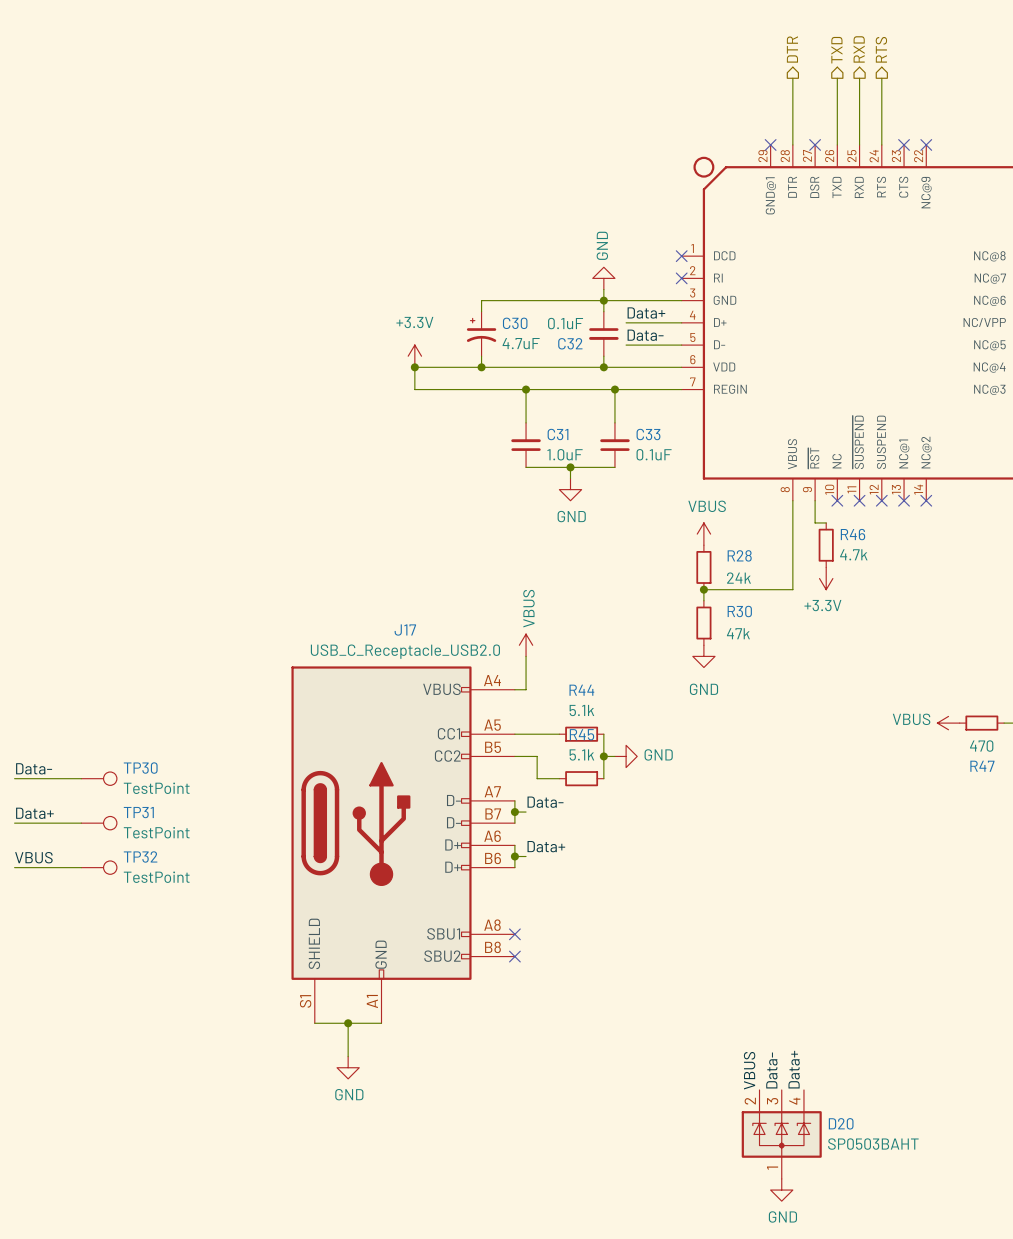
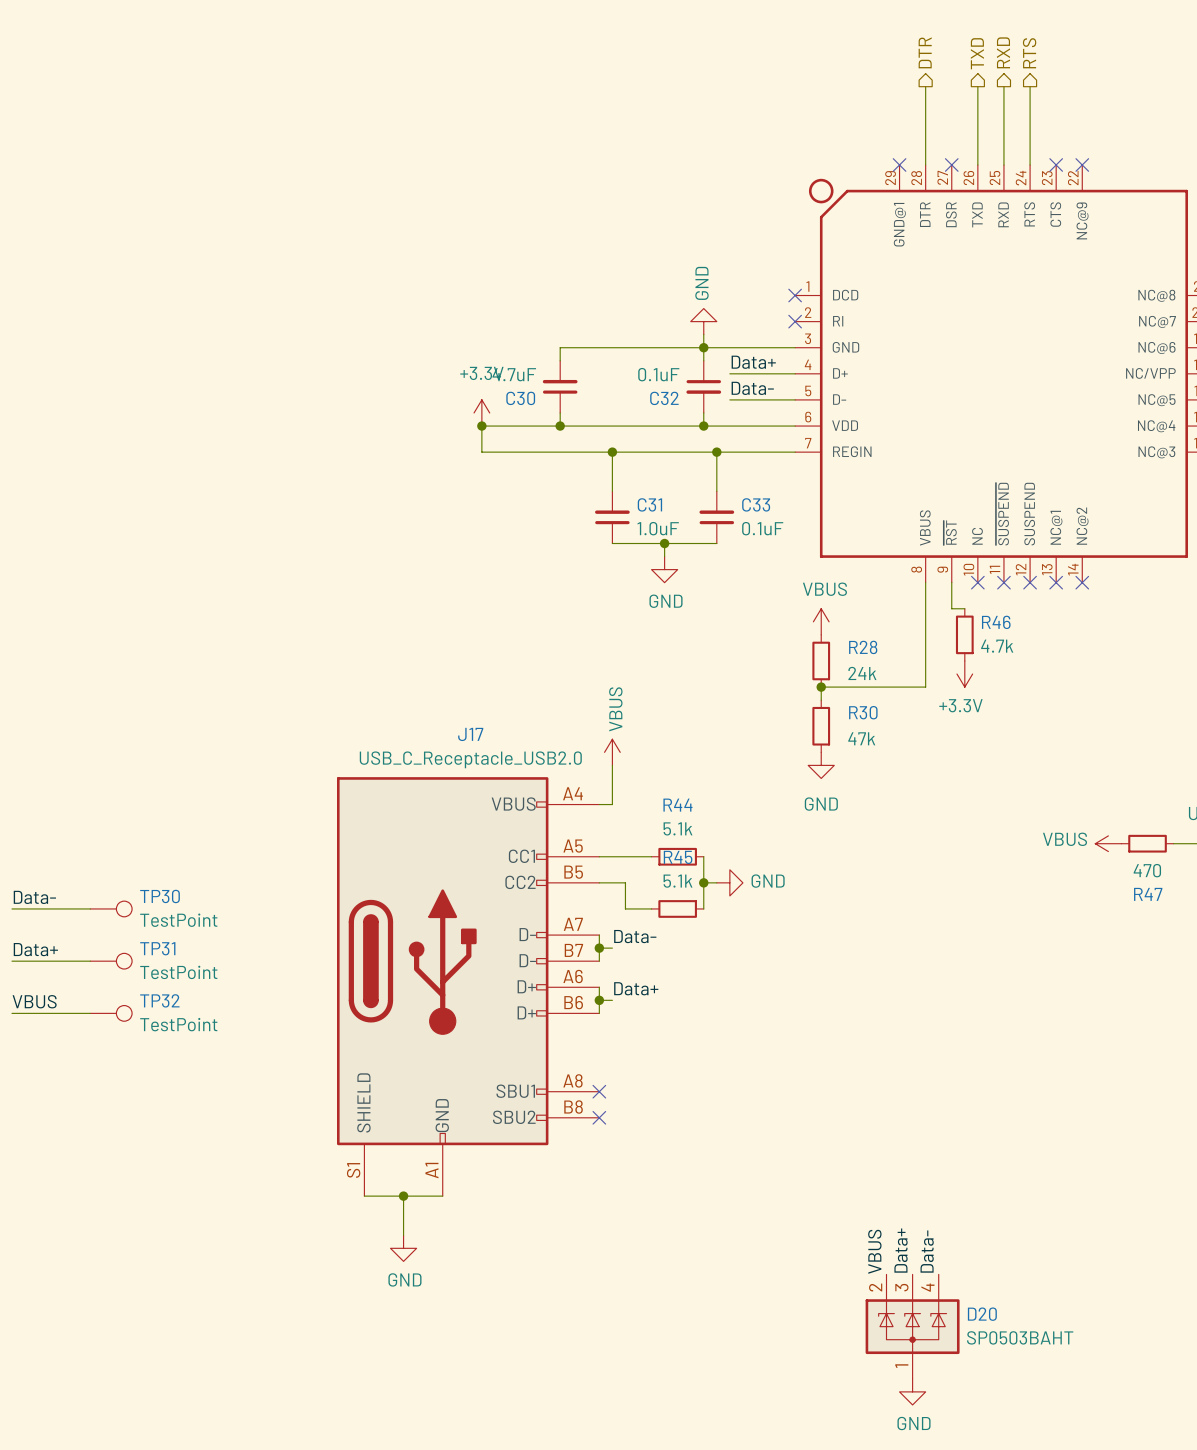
C30 symbol: [466, 311, 497, 357] -> [542, 360, 578, 413]
C30 name position: C30 (515, 323) -> C30 (520, 398)
C30 value position: 4.7uF (521, 343) -> 4.7uF (514, 374)
label: Data+ (794, 1069) -> Data- (927, 1251)
label: Data- (771, 1070) -> Data+ (901, 1250)

